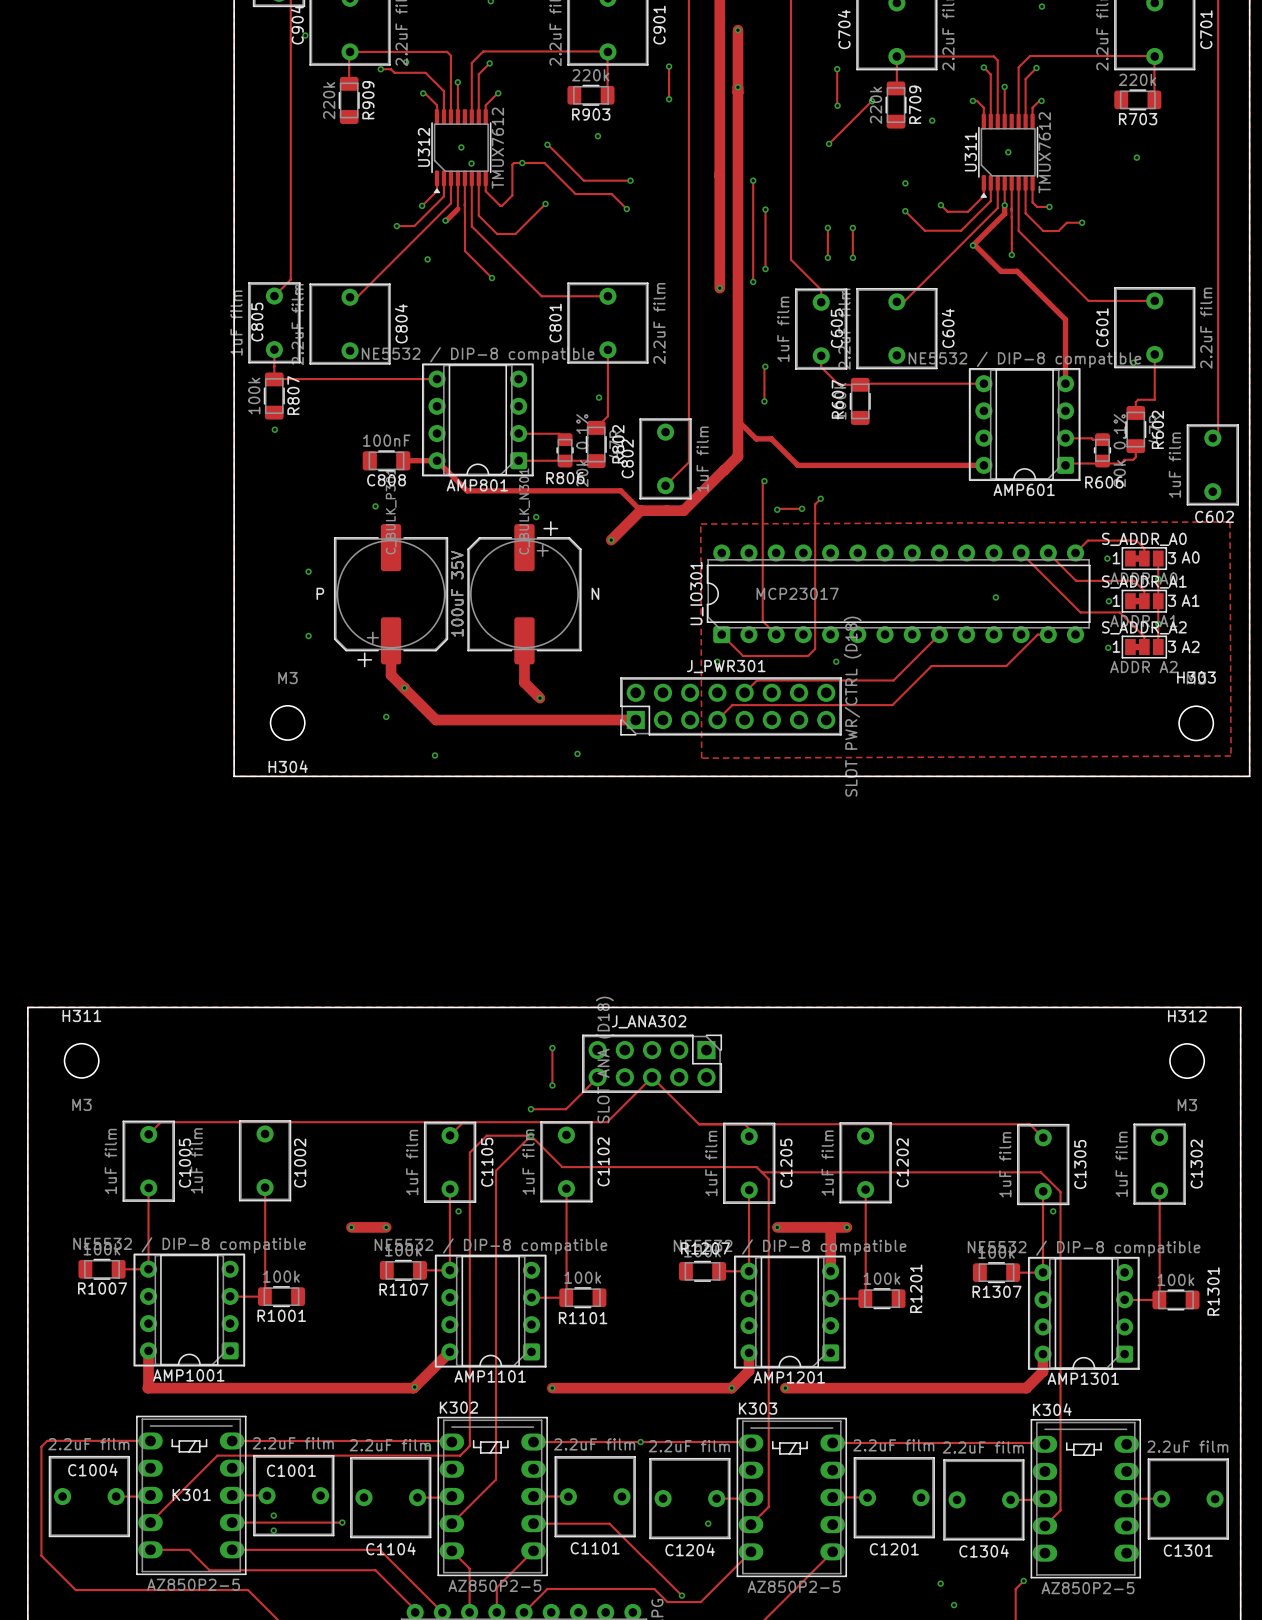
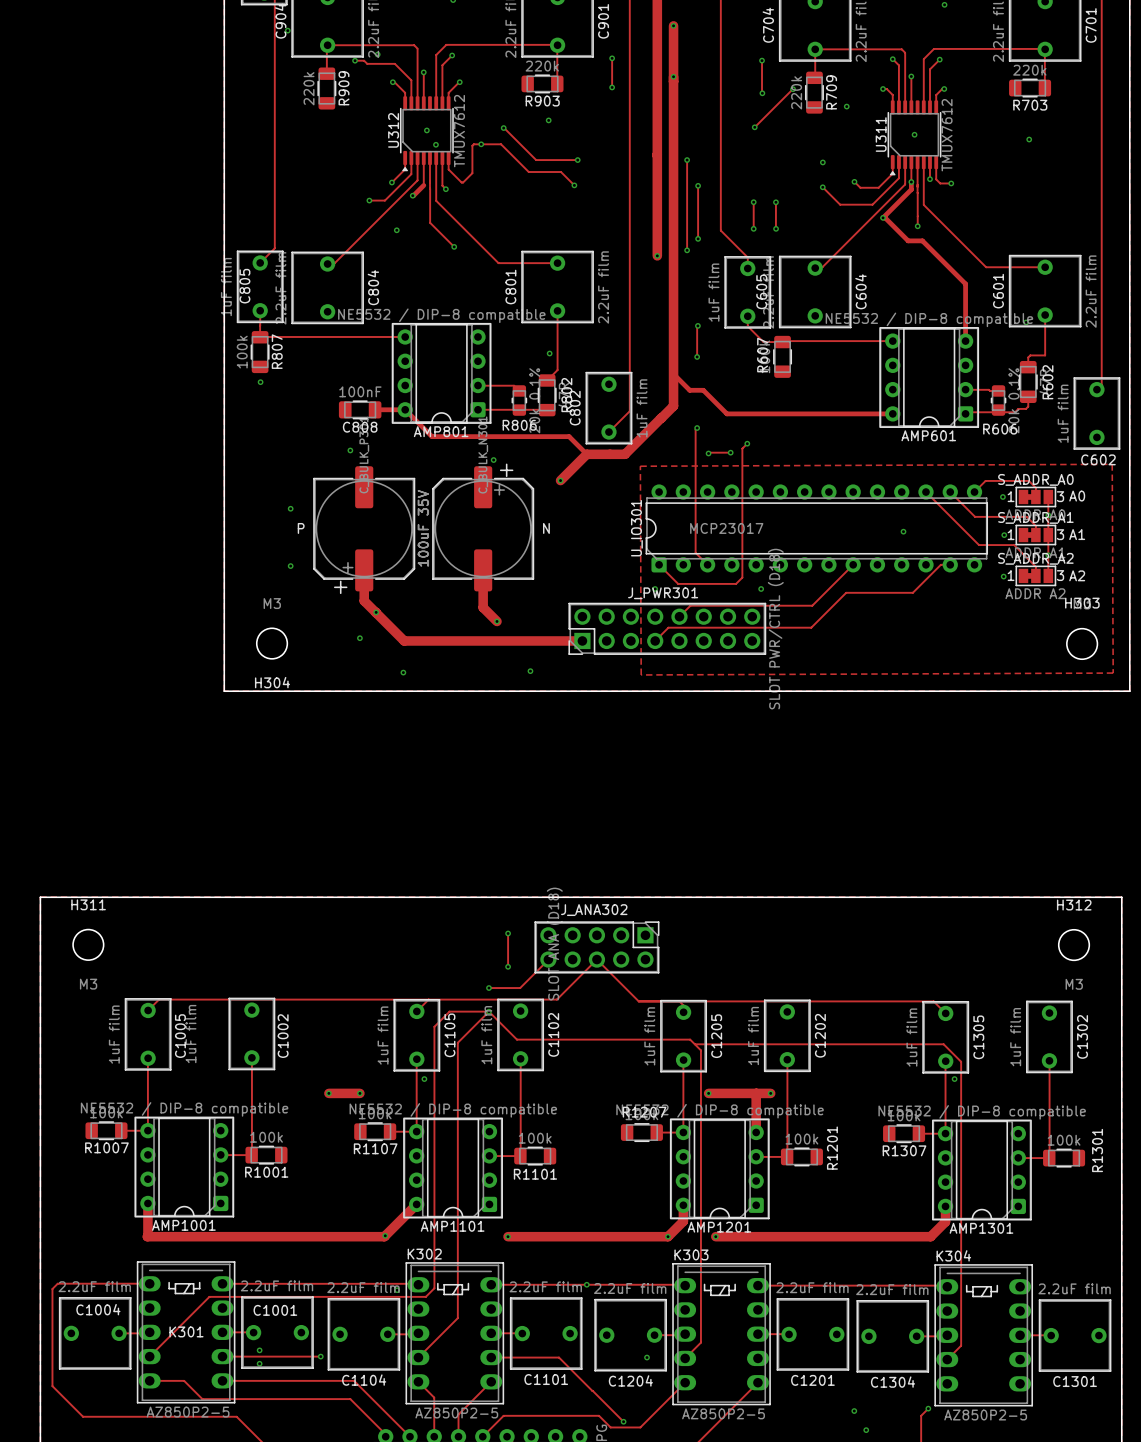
track: (1025, 202) (1025, 213) (1043, 231) (1058, 231) (1066, 222) (1082, 222) -> none
track: (545, 203) (515, 233) (497, 233) (478, 215) (478, 209) -> (445, 189) (442, 185)
via position: (545, 203) -> (445, 189)
via position: (1082, 222) -> (930, 179)

